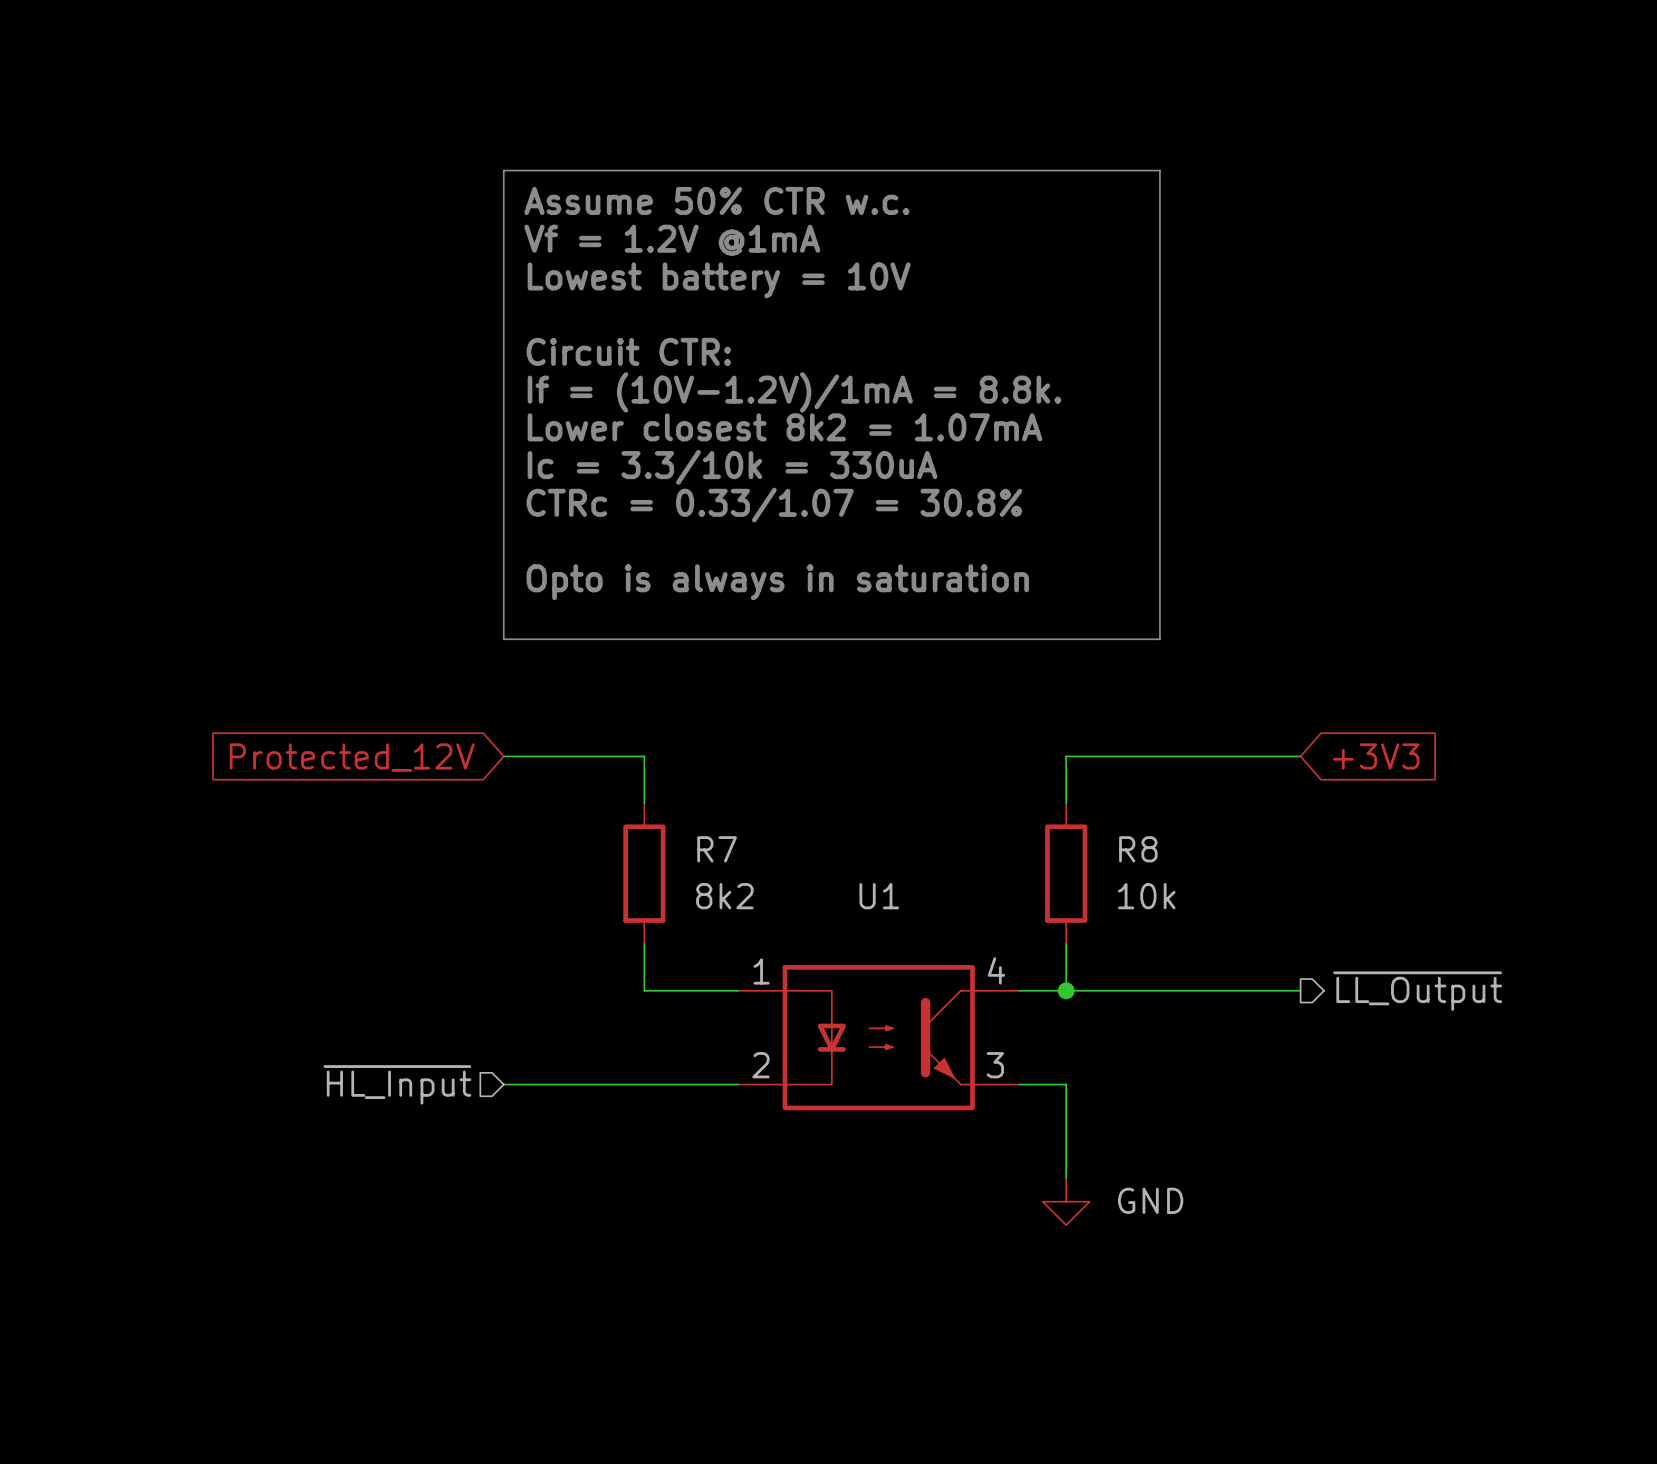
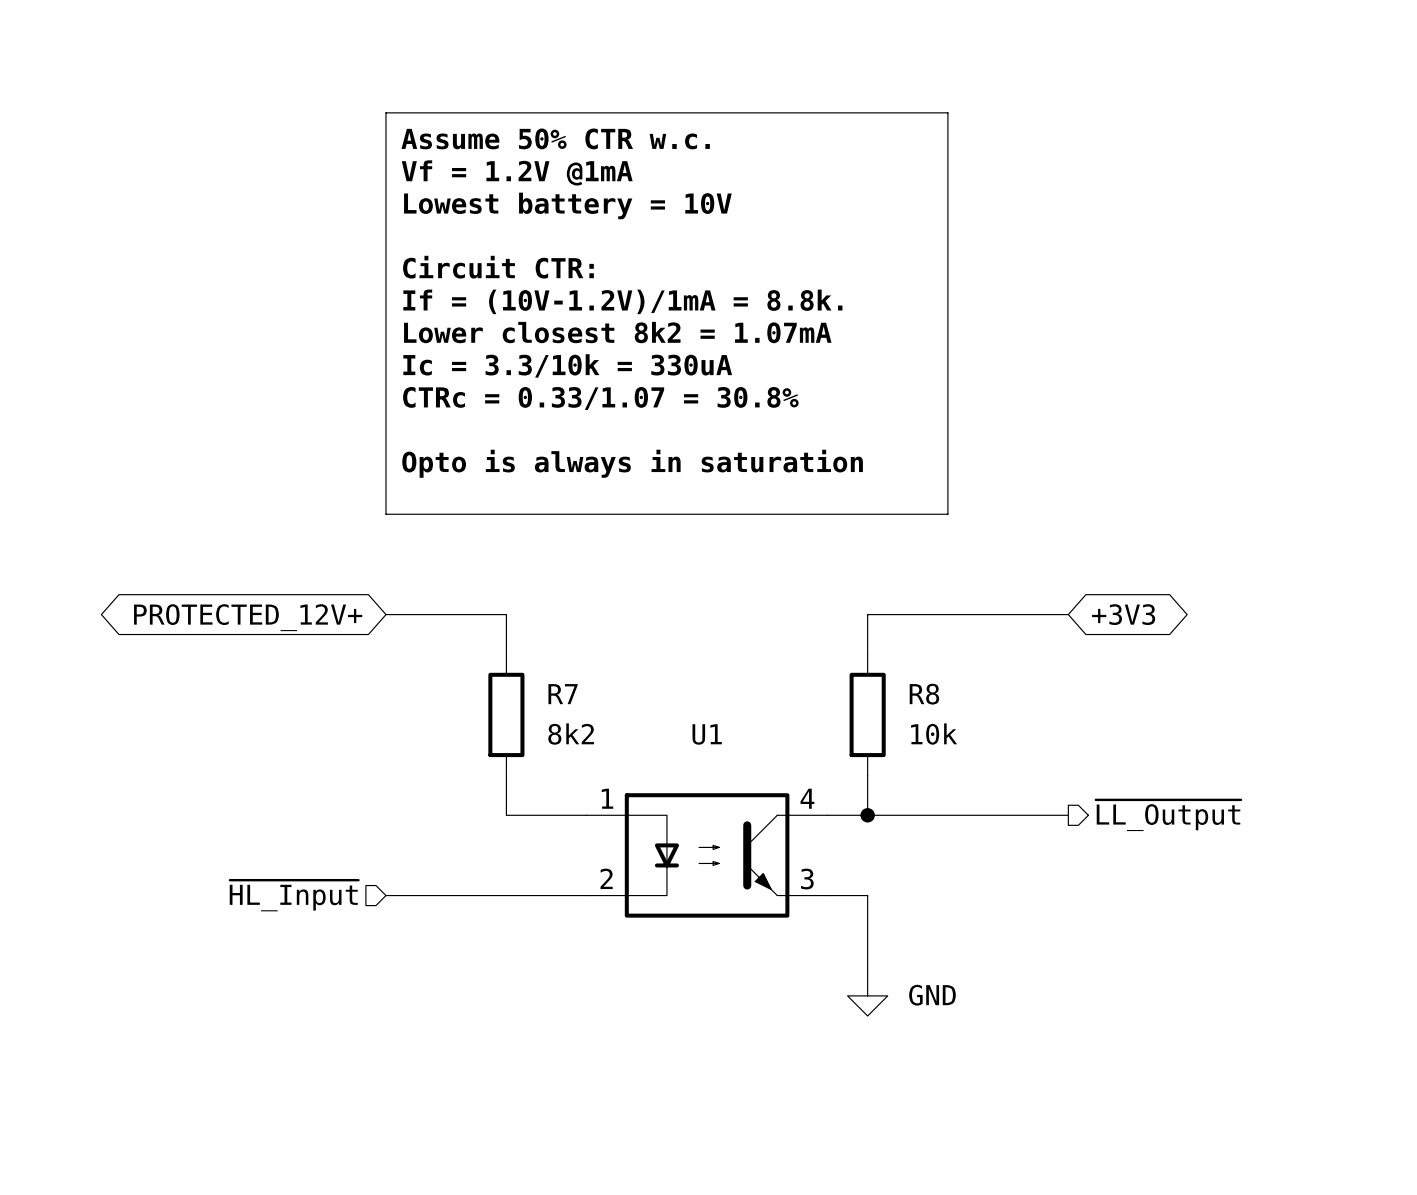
global label shape: input (1376, 756) -> bidirectional (1123, 614)
global label shape: input (352, 757) -> bidirectional (248, 617)
global label: Protected_12V (352, 757) -> PROTECTED_12V+ (248, 617)

